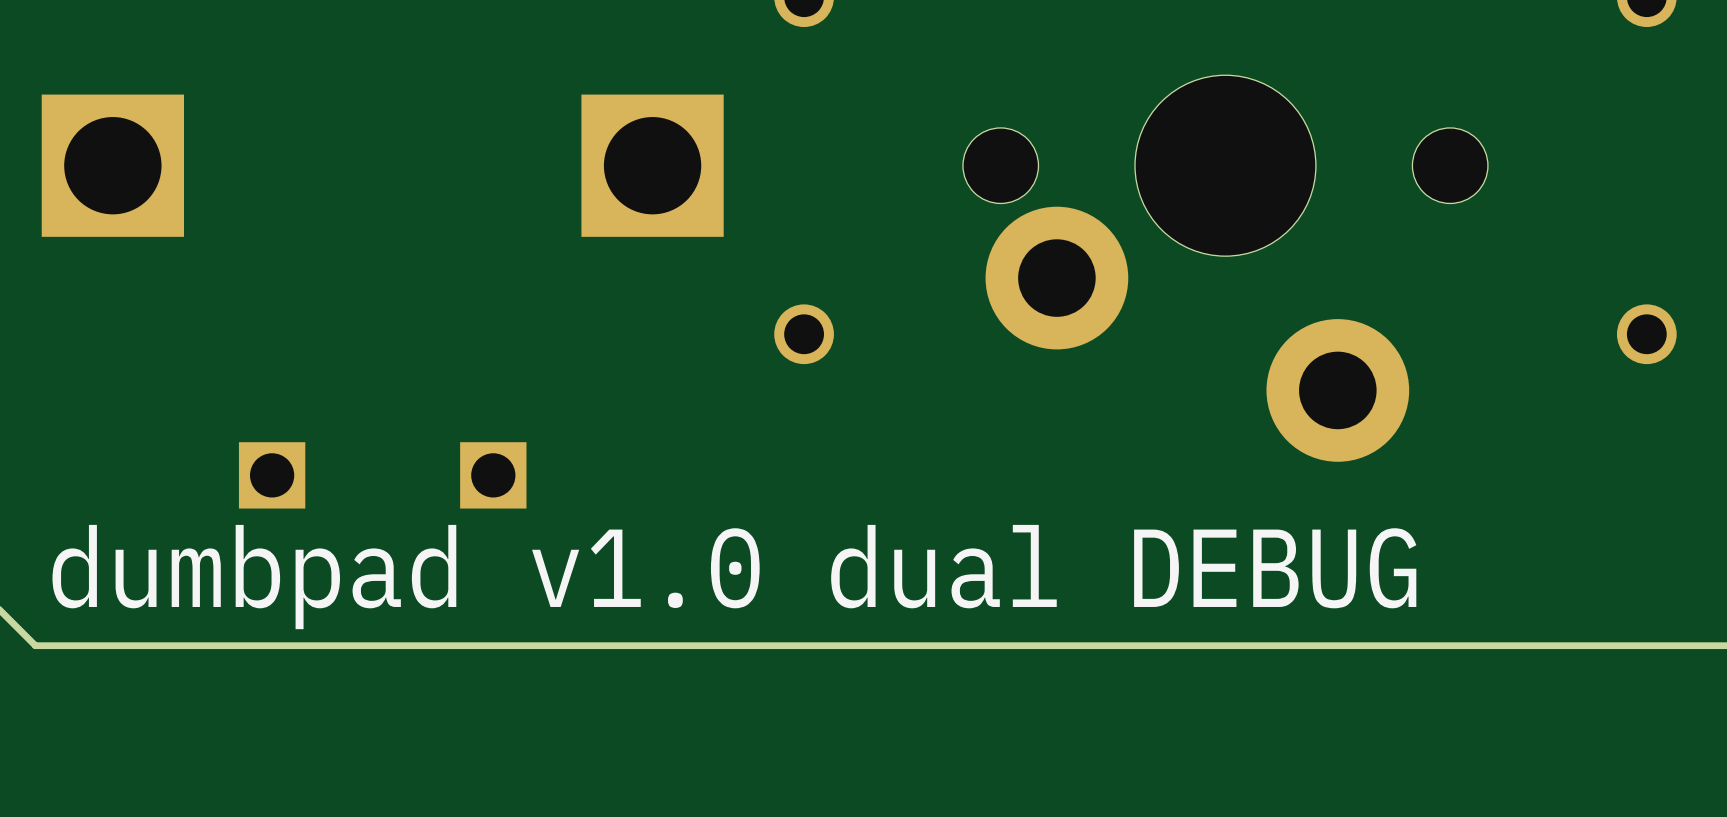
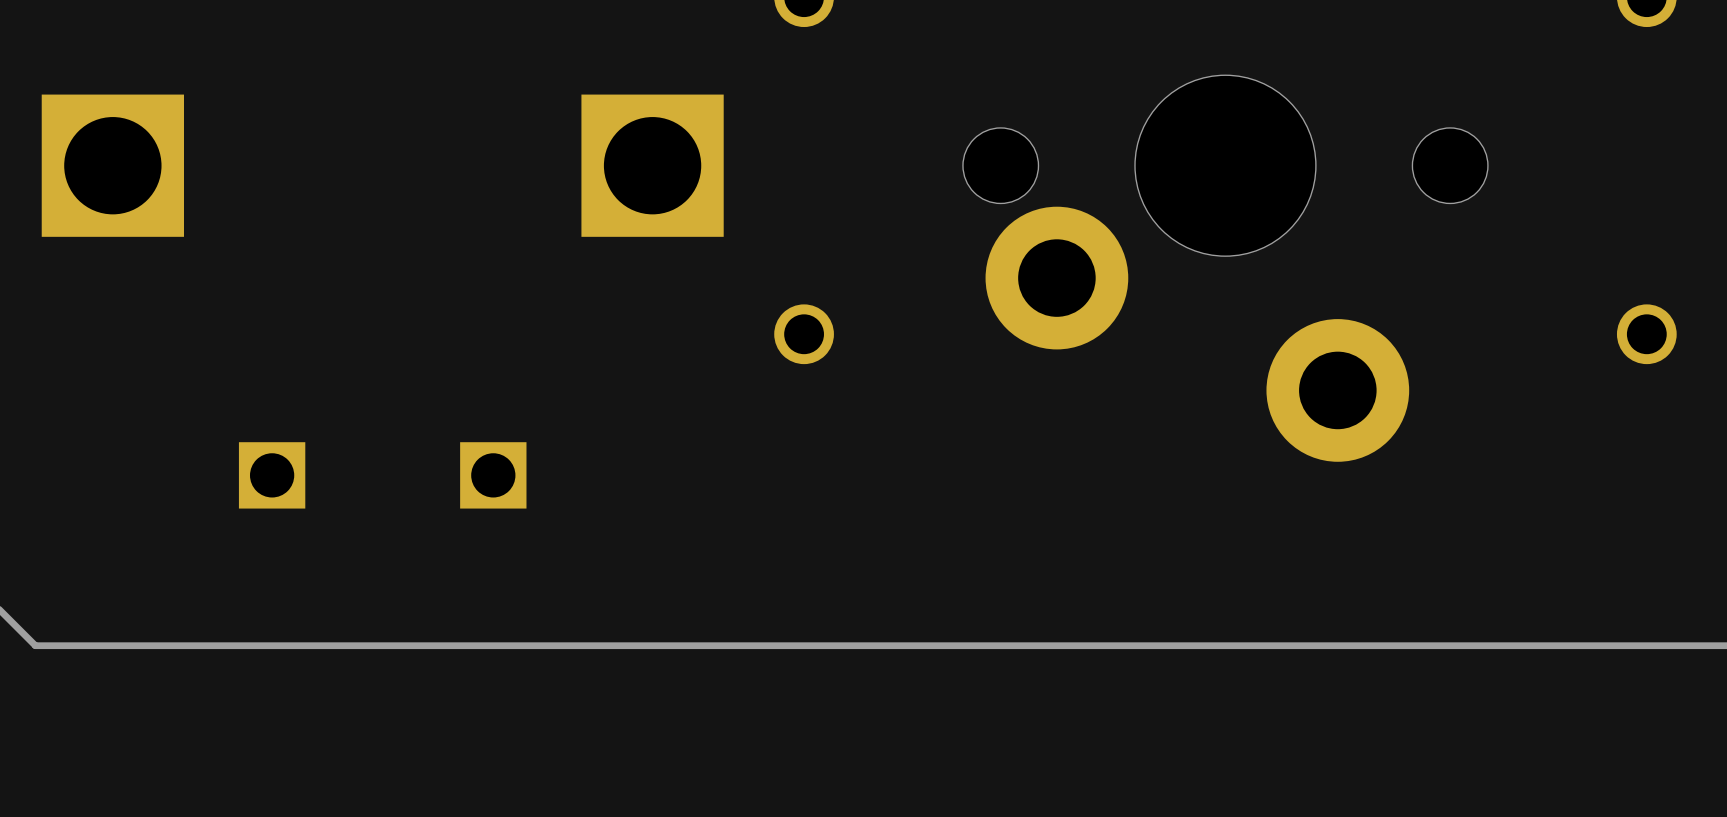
text: dumbpad v1.0 dual DEBUG (734, 577) -> none

